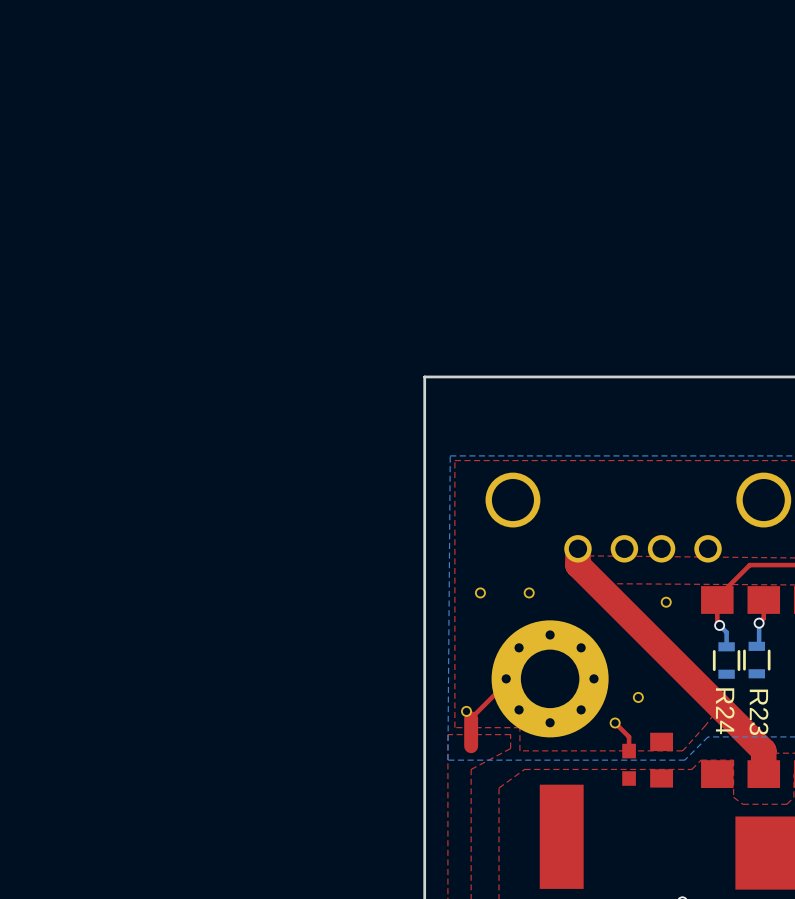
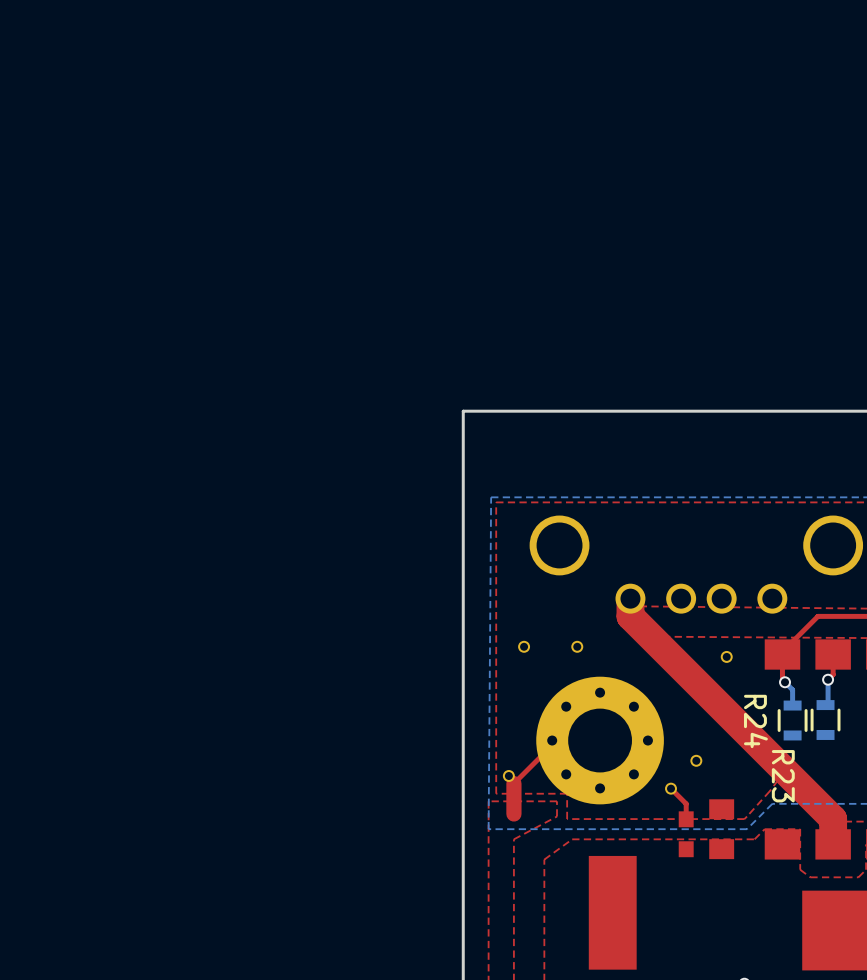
R24 name position: R24 (725, 711) -> R24 (755, 721)
R23 name position: R23 (758, 712) -> R23 (783, 776)

